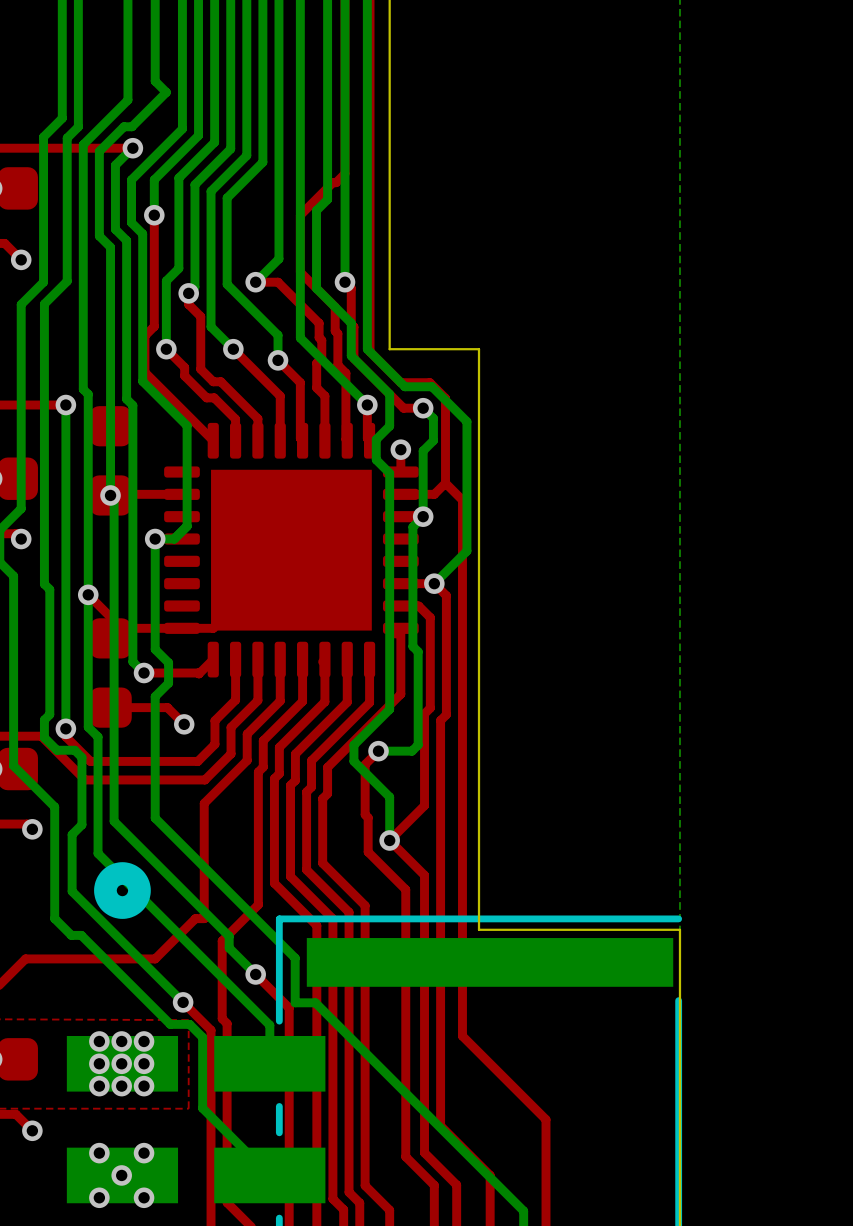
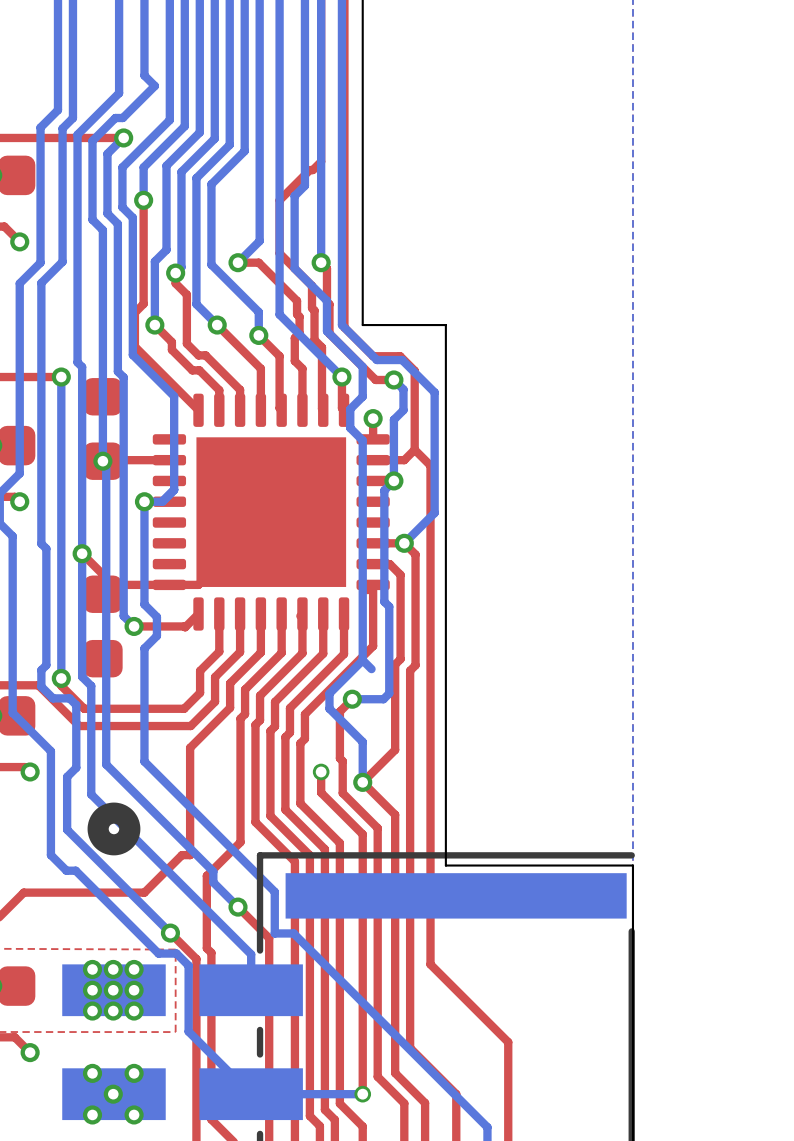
top track: (110, 707) (167, 707) (184, 724) -> none
bottom track: none -> (362, 660) (371, 669)
via: (184, 724) -> none
top track: none -> (321, 771) (321, 792) (362, 834) (362, 1094)
via: none -> (321, 771)
bottom track: none -> (362, 1094) (251, 1094)
via: none -> (362, 1094)

